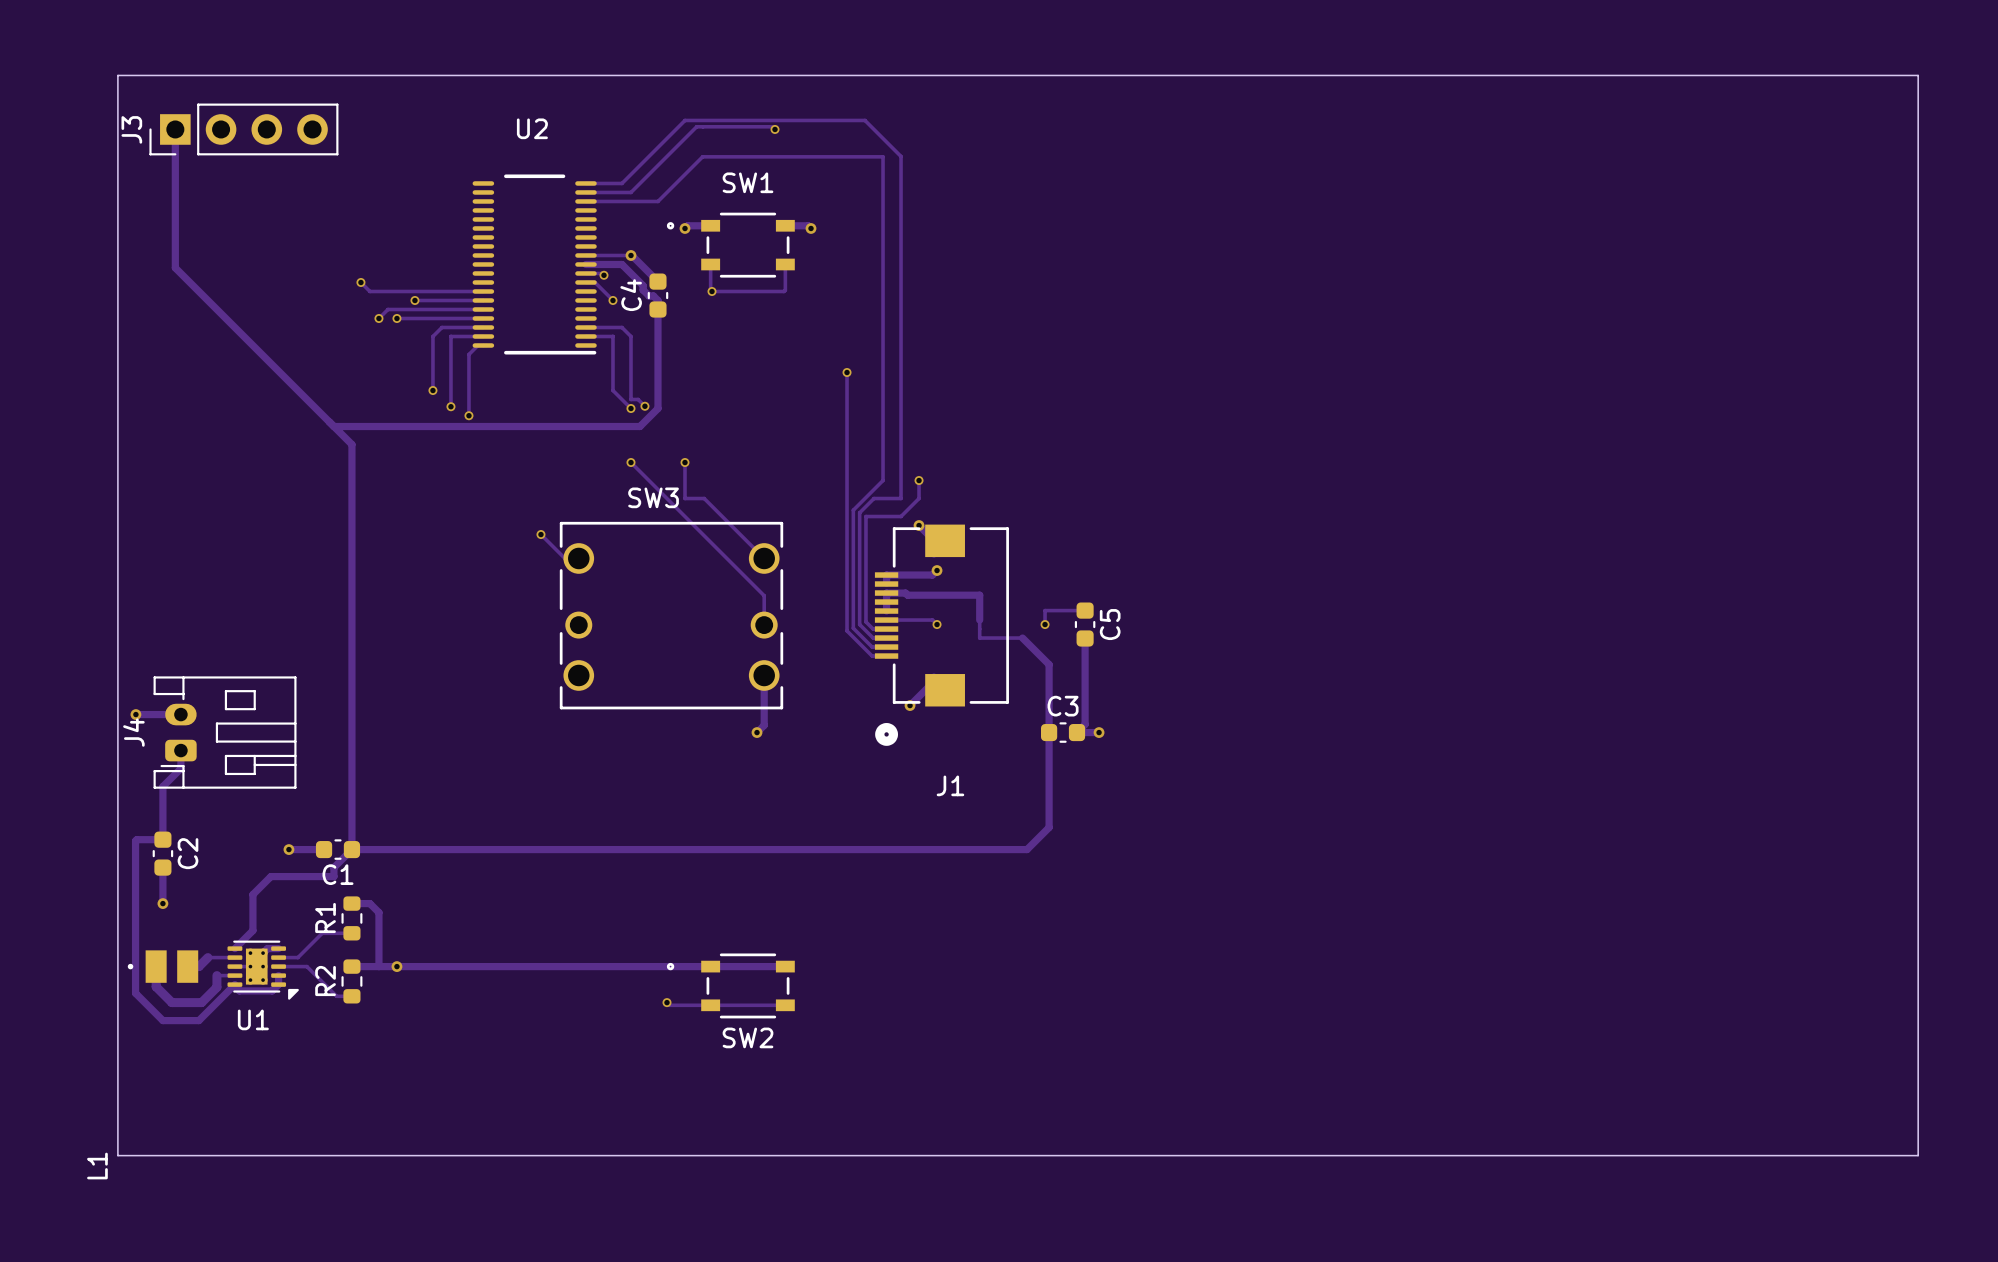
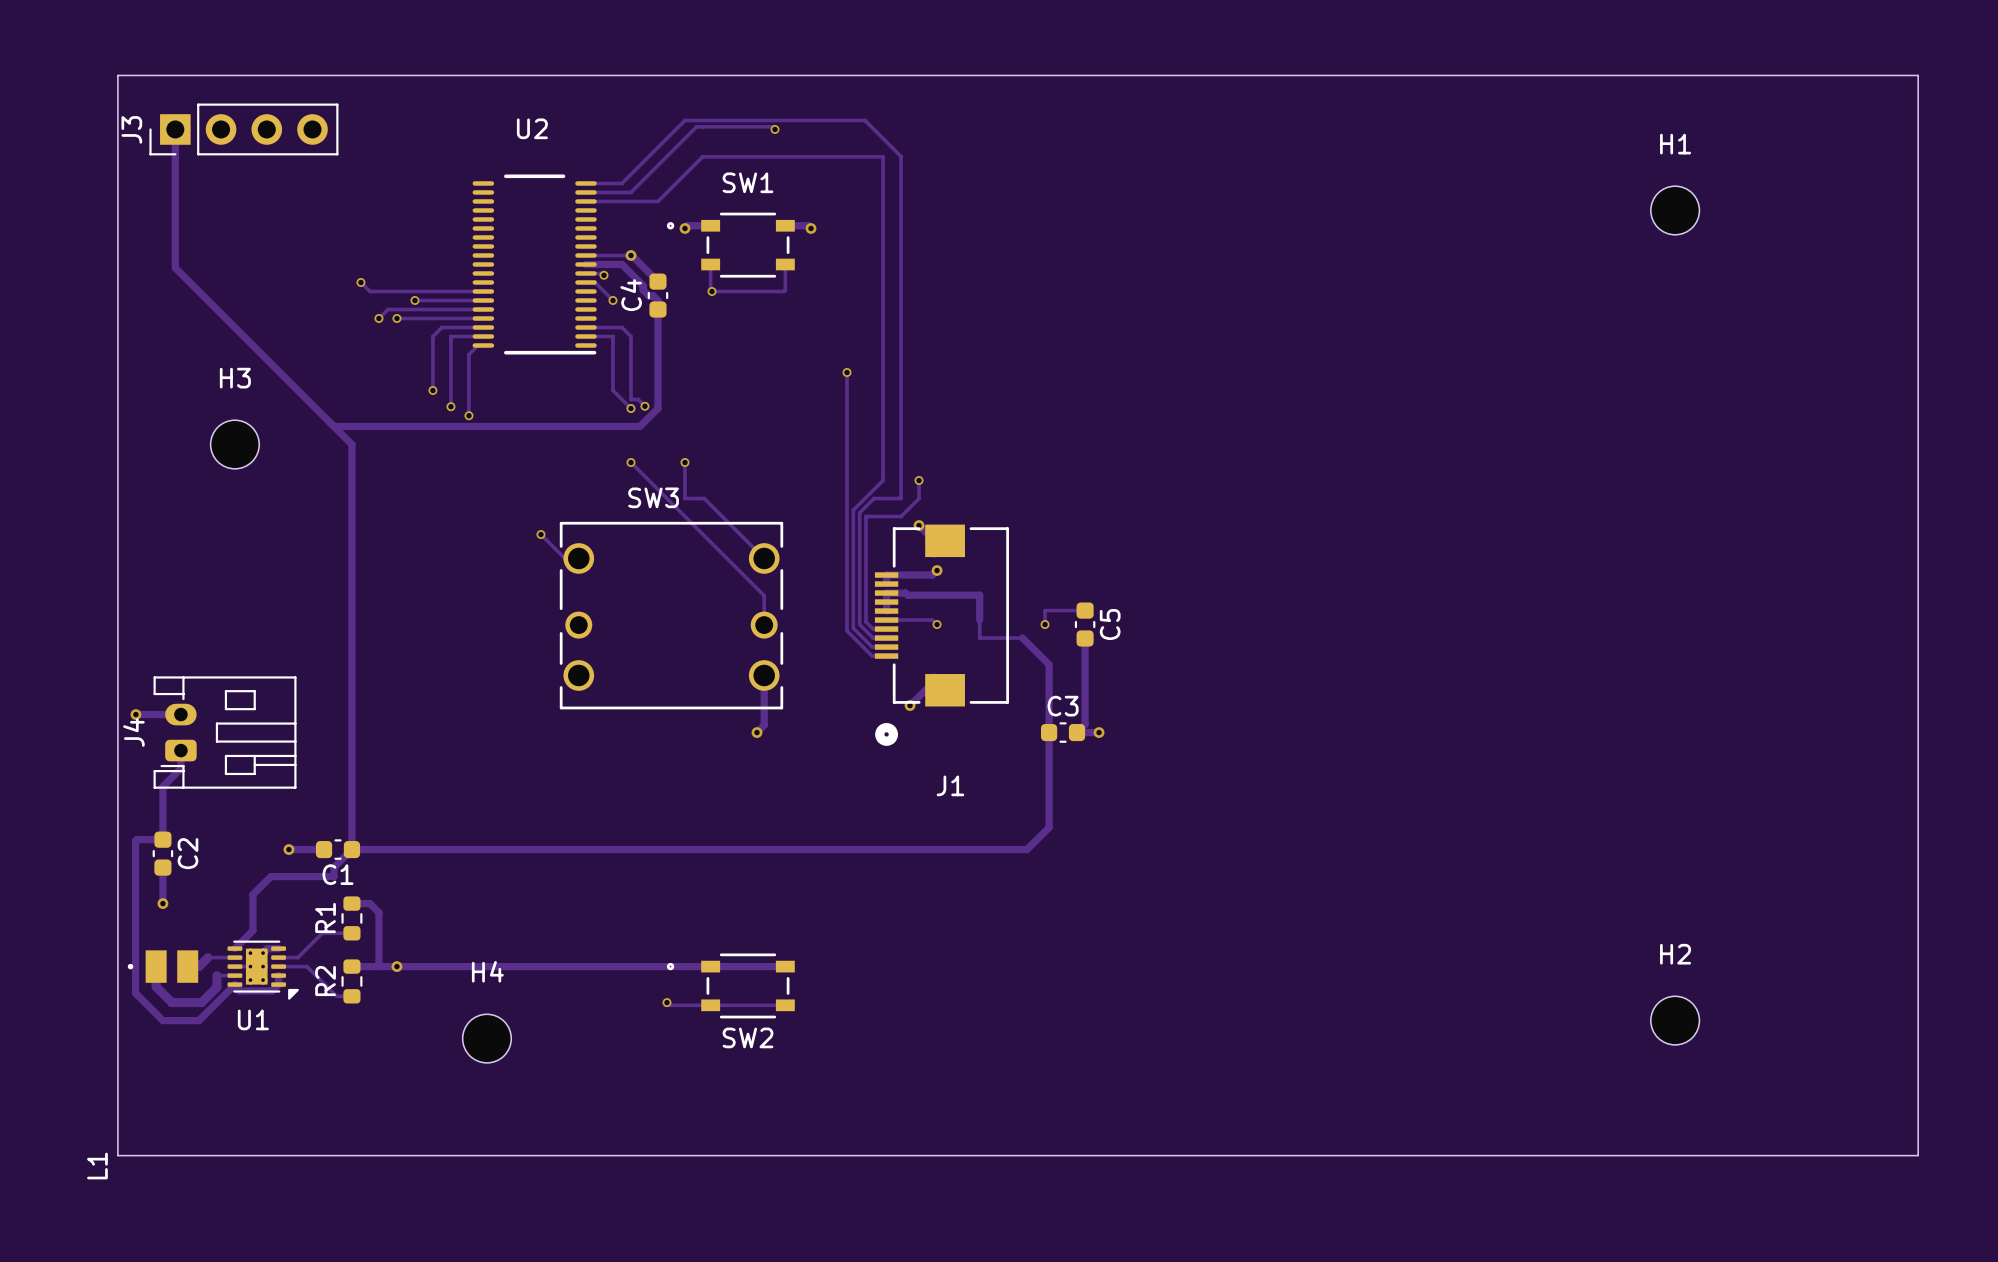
H1: none -> (1675, 210)
H3: none -> (234, 444)
H2: none -> (1675, 1020)
H4: none -> (486, 1038)

